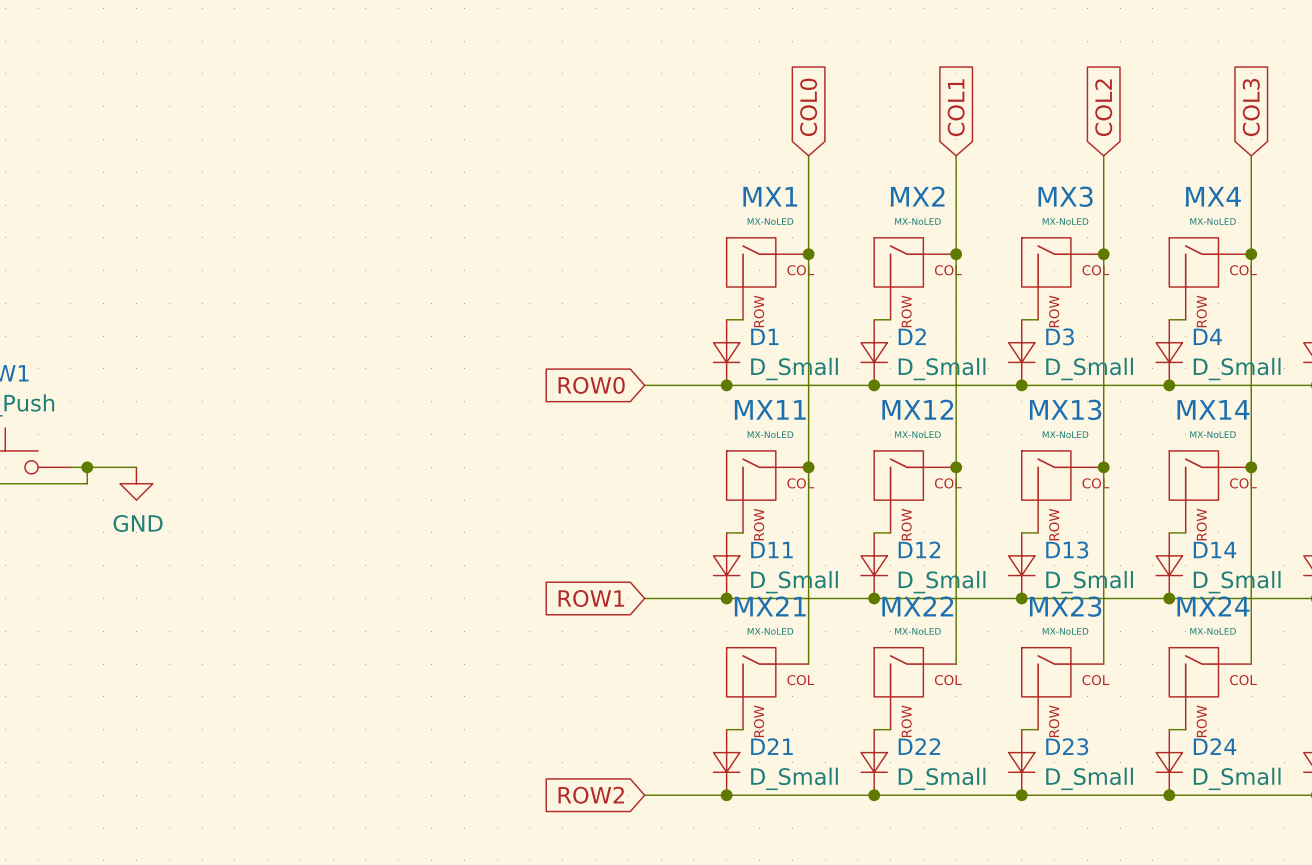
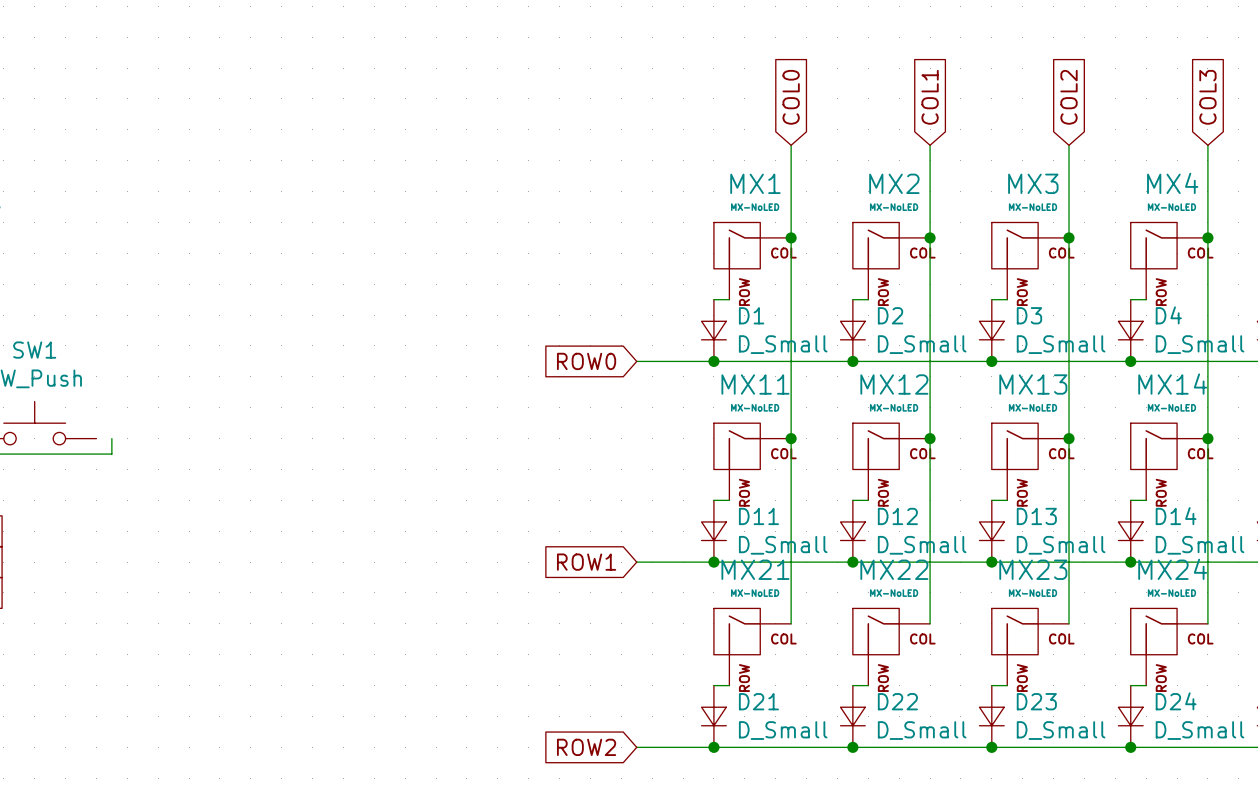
wire: (70, 467) (136, 467) -> none
junction: (87, 467) -> none
power symbol: GND (136, 483) -> none

